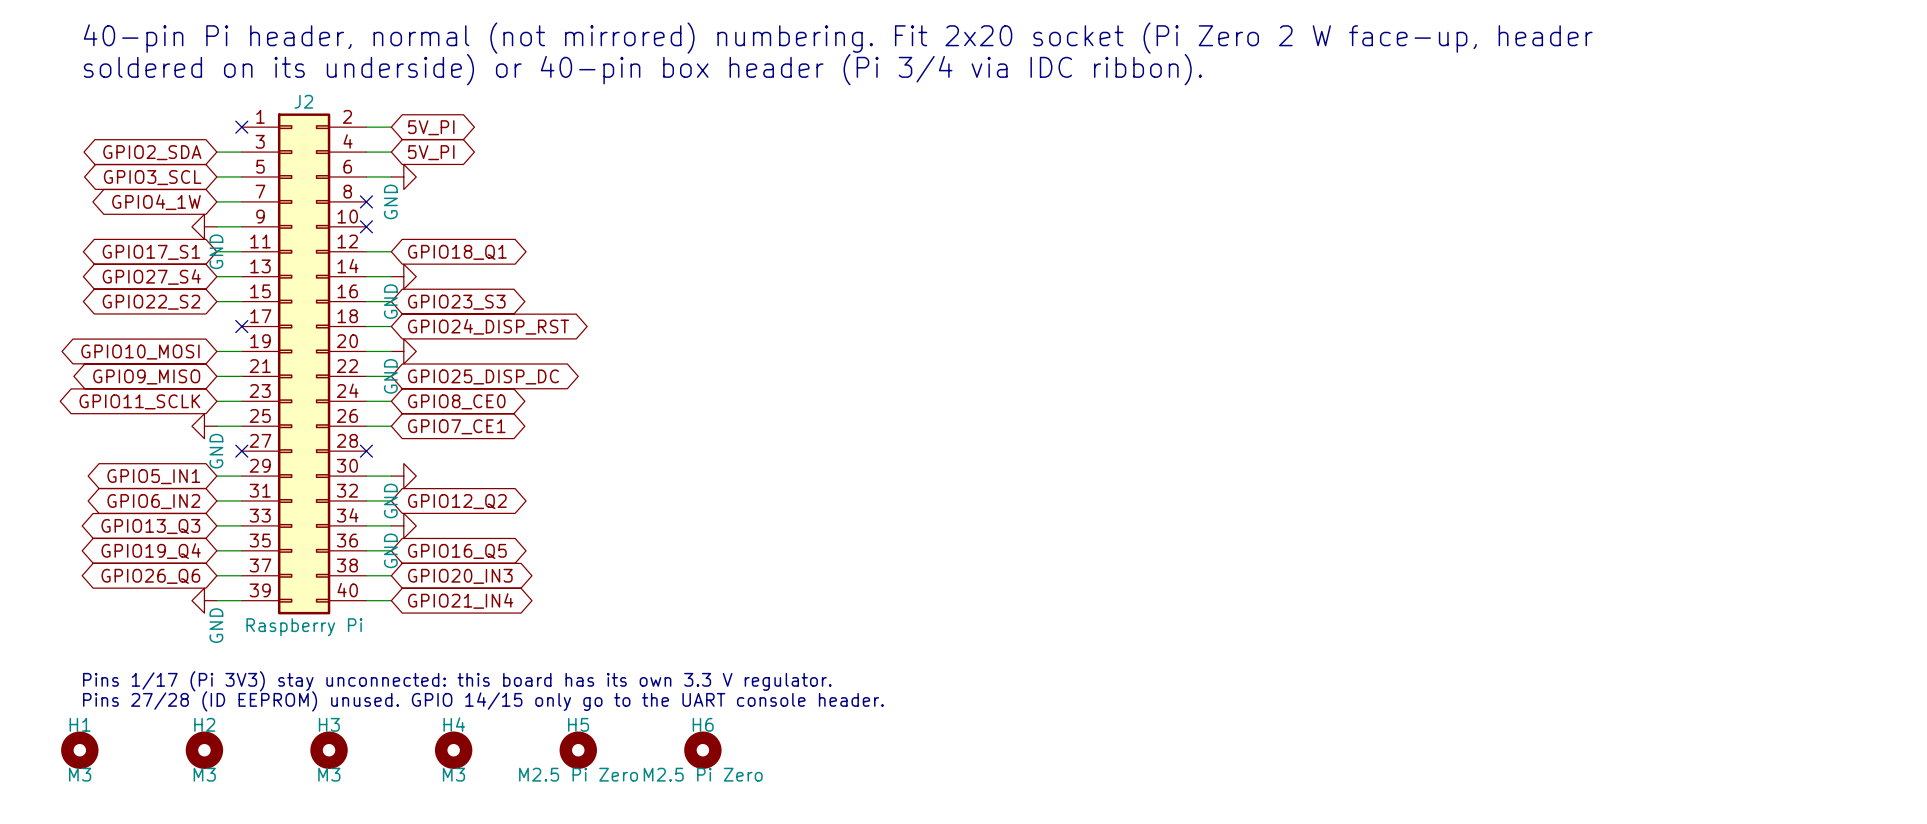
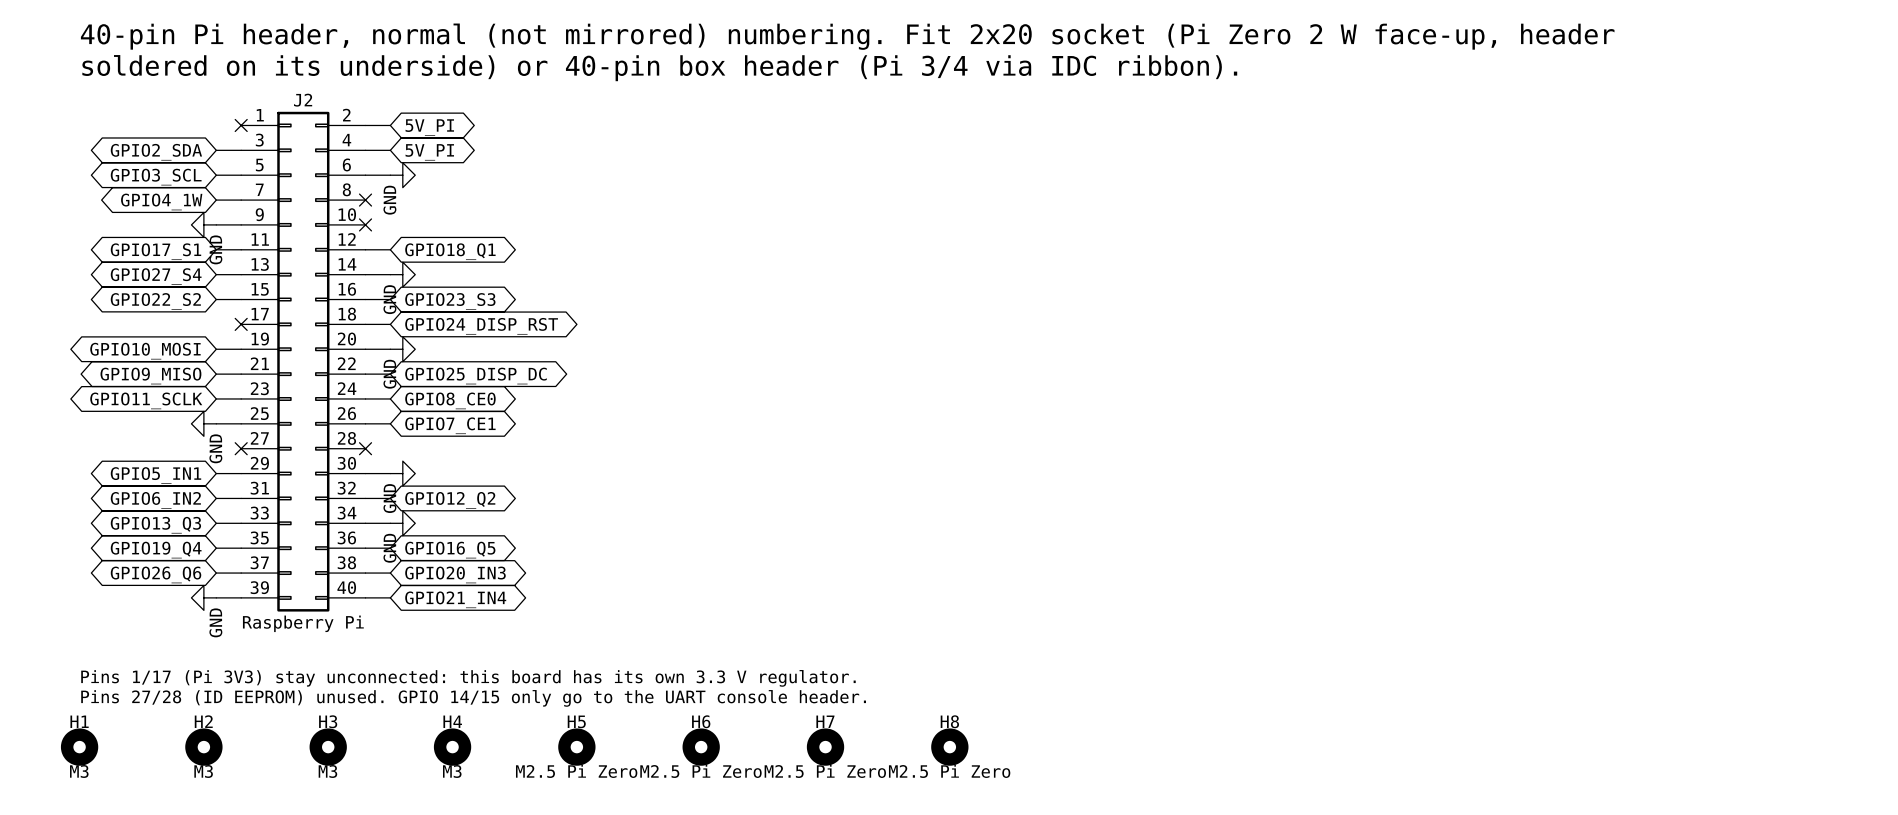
H7: none -> M2.5 Pi Zero (825, 747)
H8: none -> M2.5 Pi Zero (949, 747)

